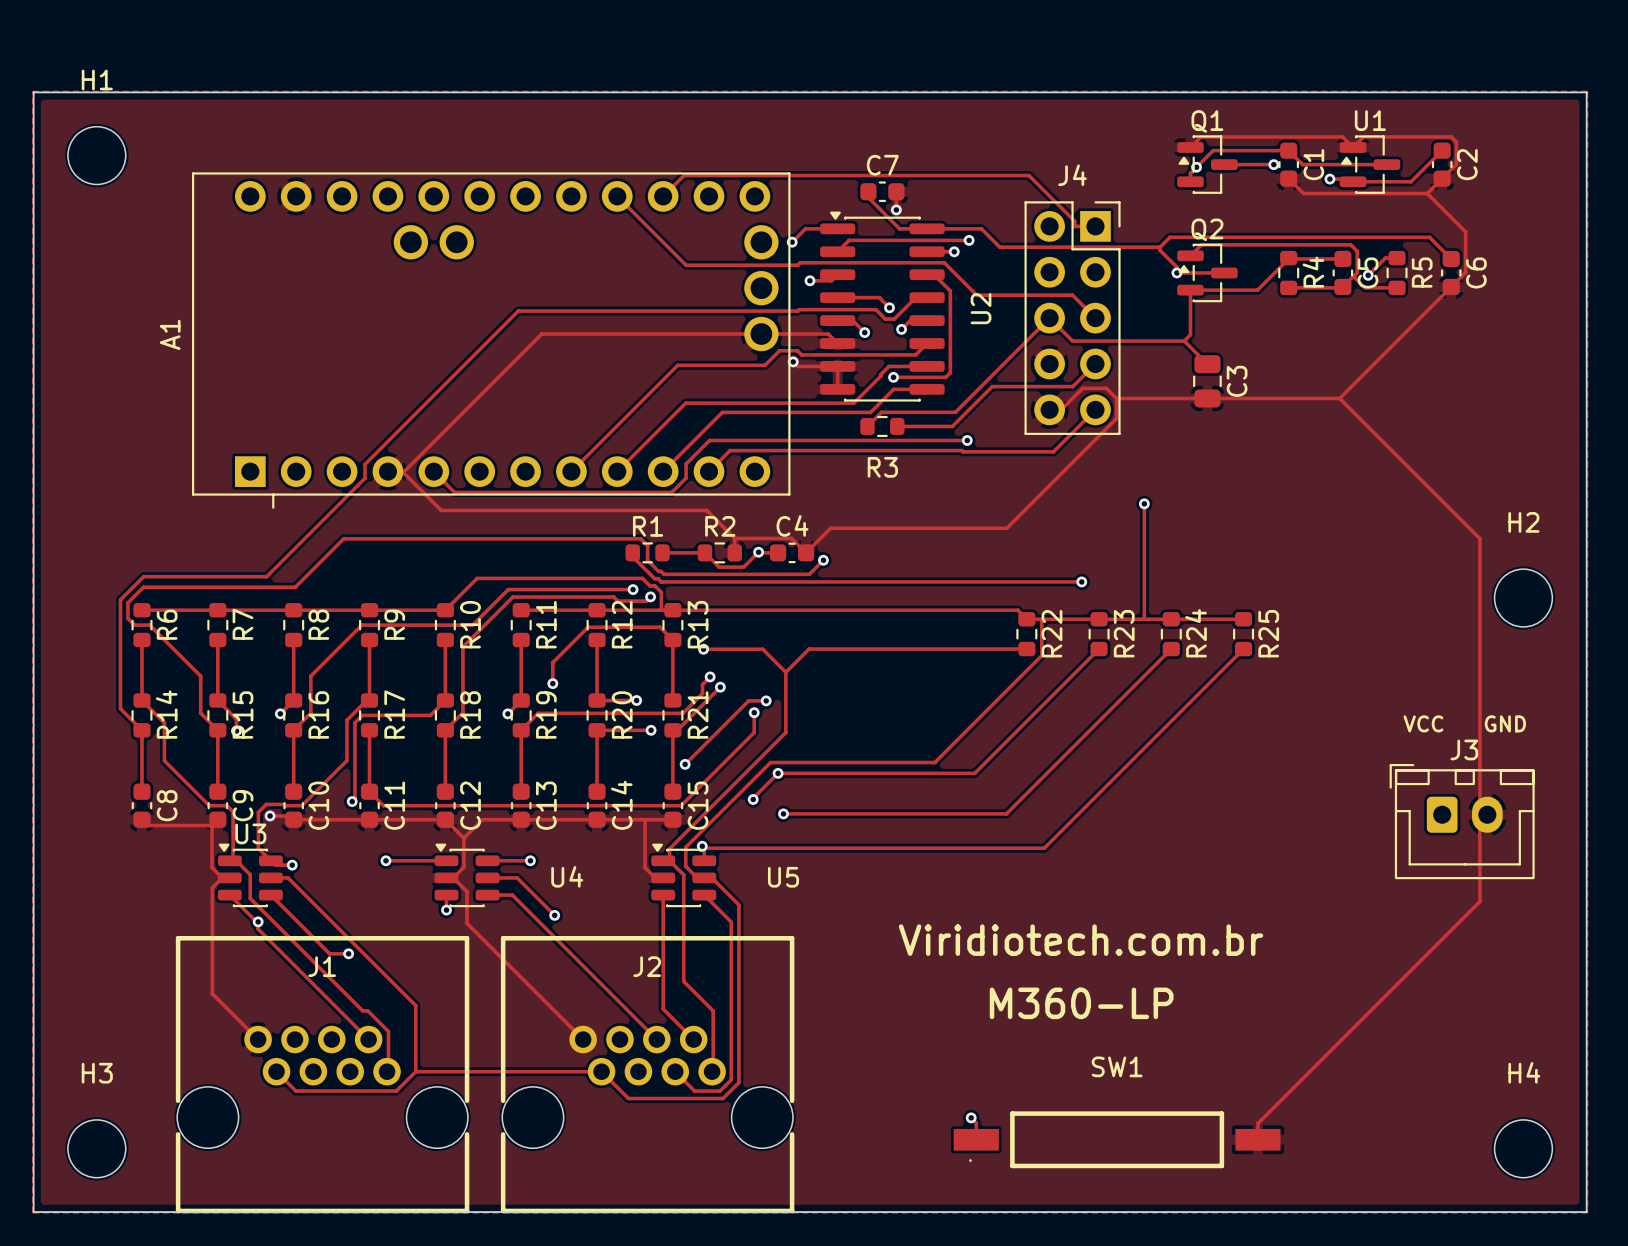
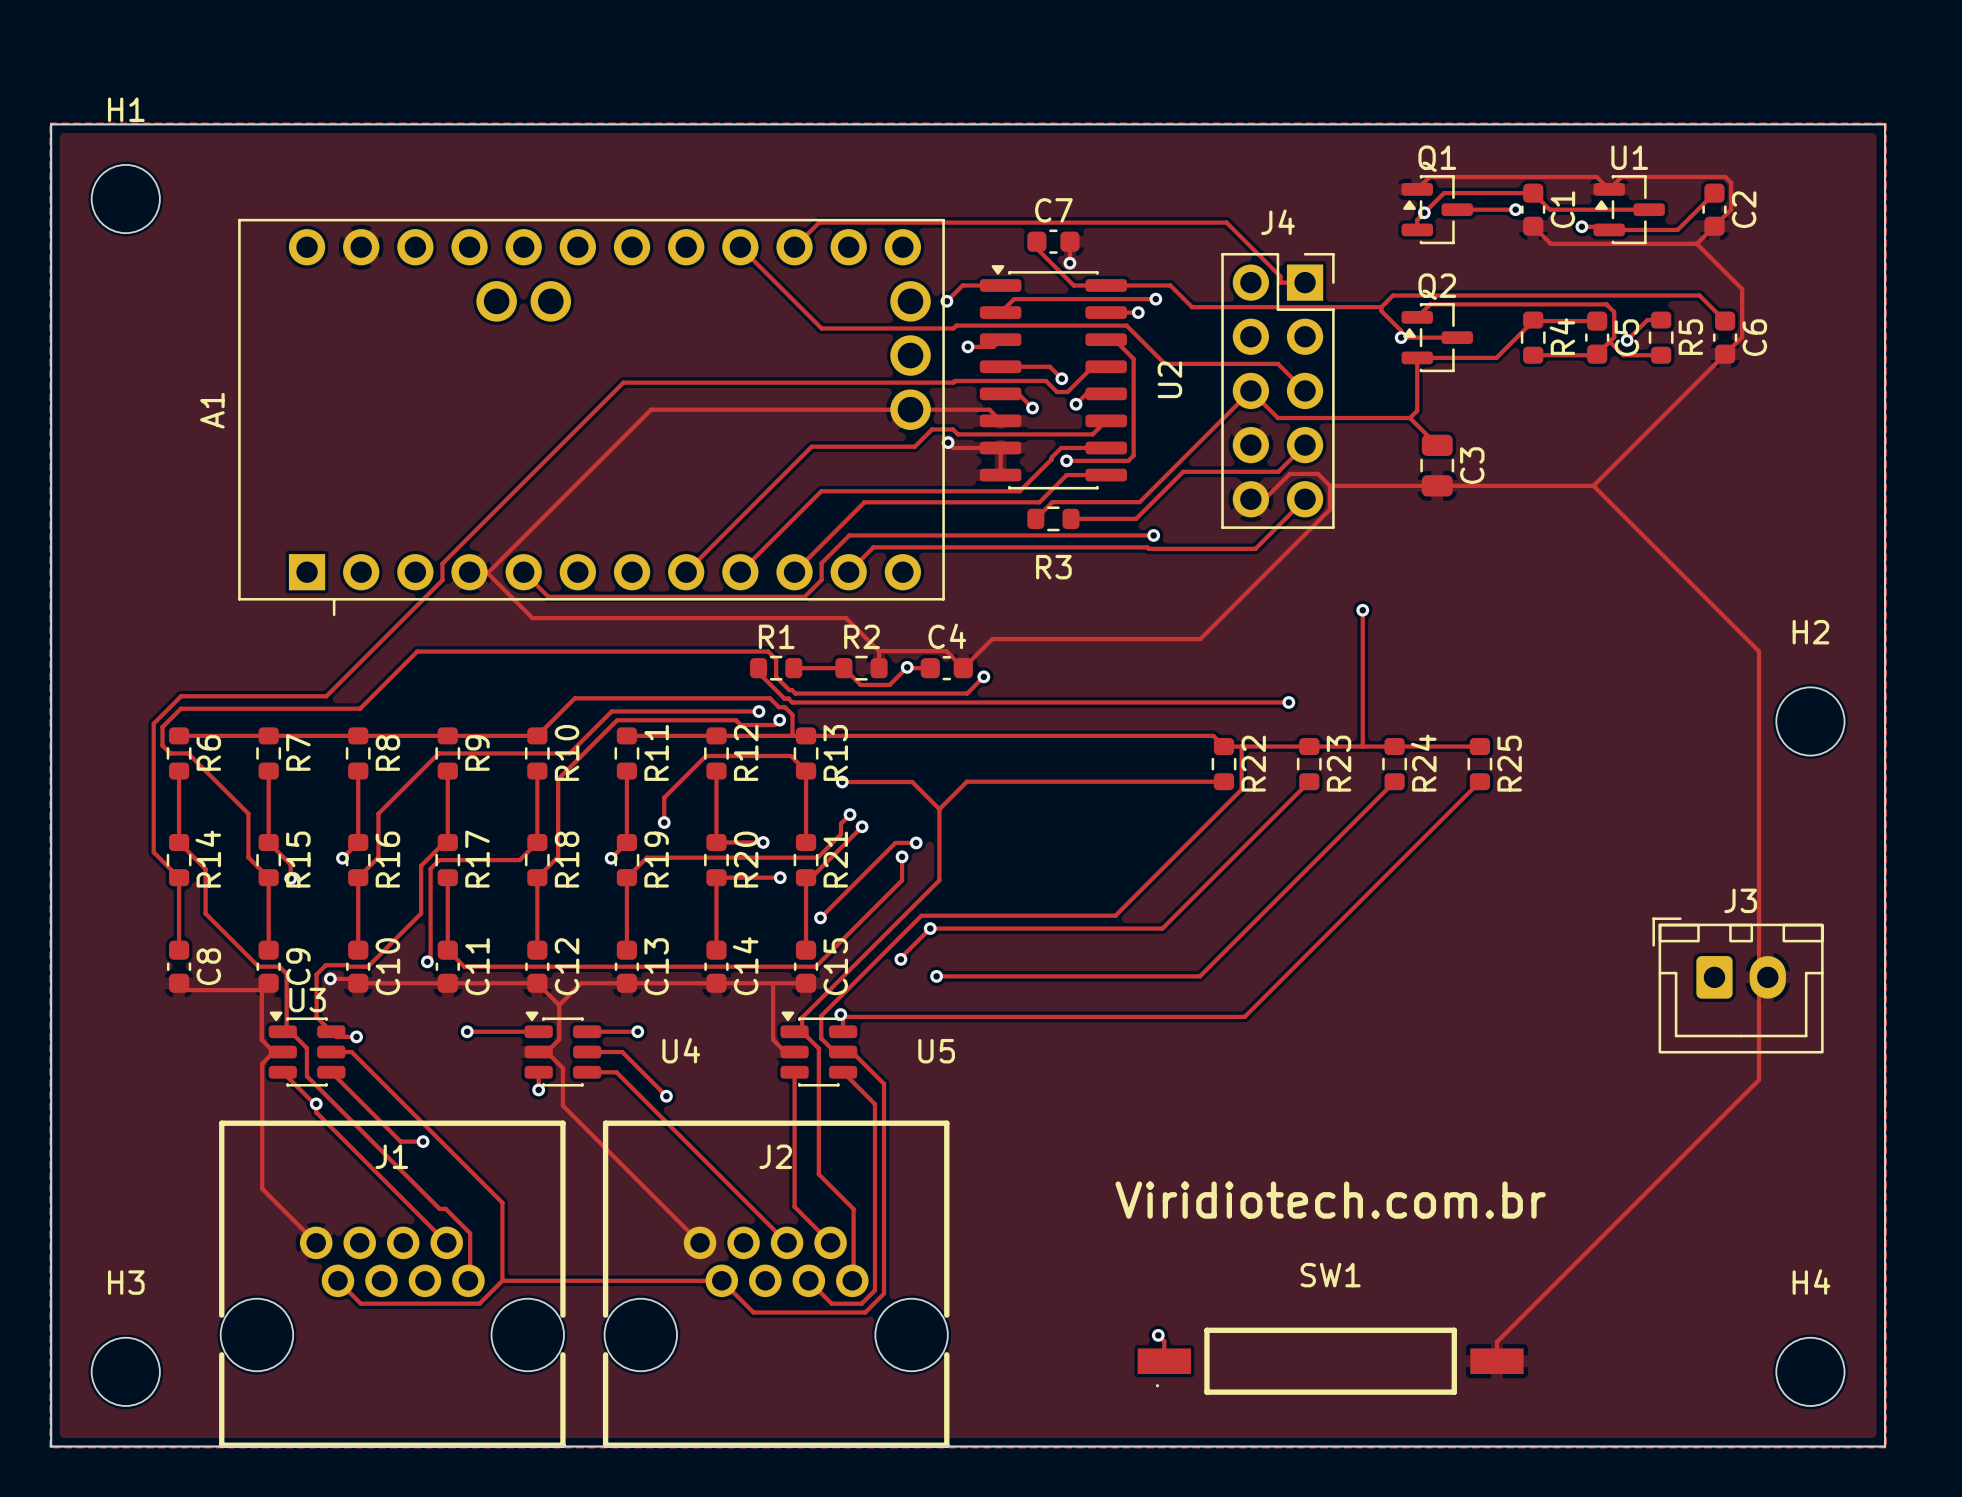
text: VCC (1423, 723) -> none
text: GND (1505, 723) -> none
text position: Viridiotech.com.br (1081, 940) -> Viridiotech.com.br (1330, 1200)
text: M360-LP (1081, 1003) -> none

